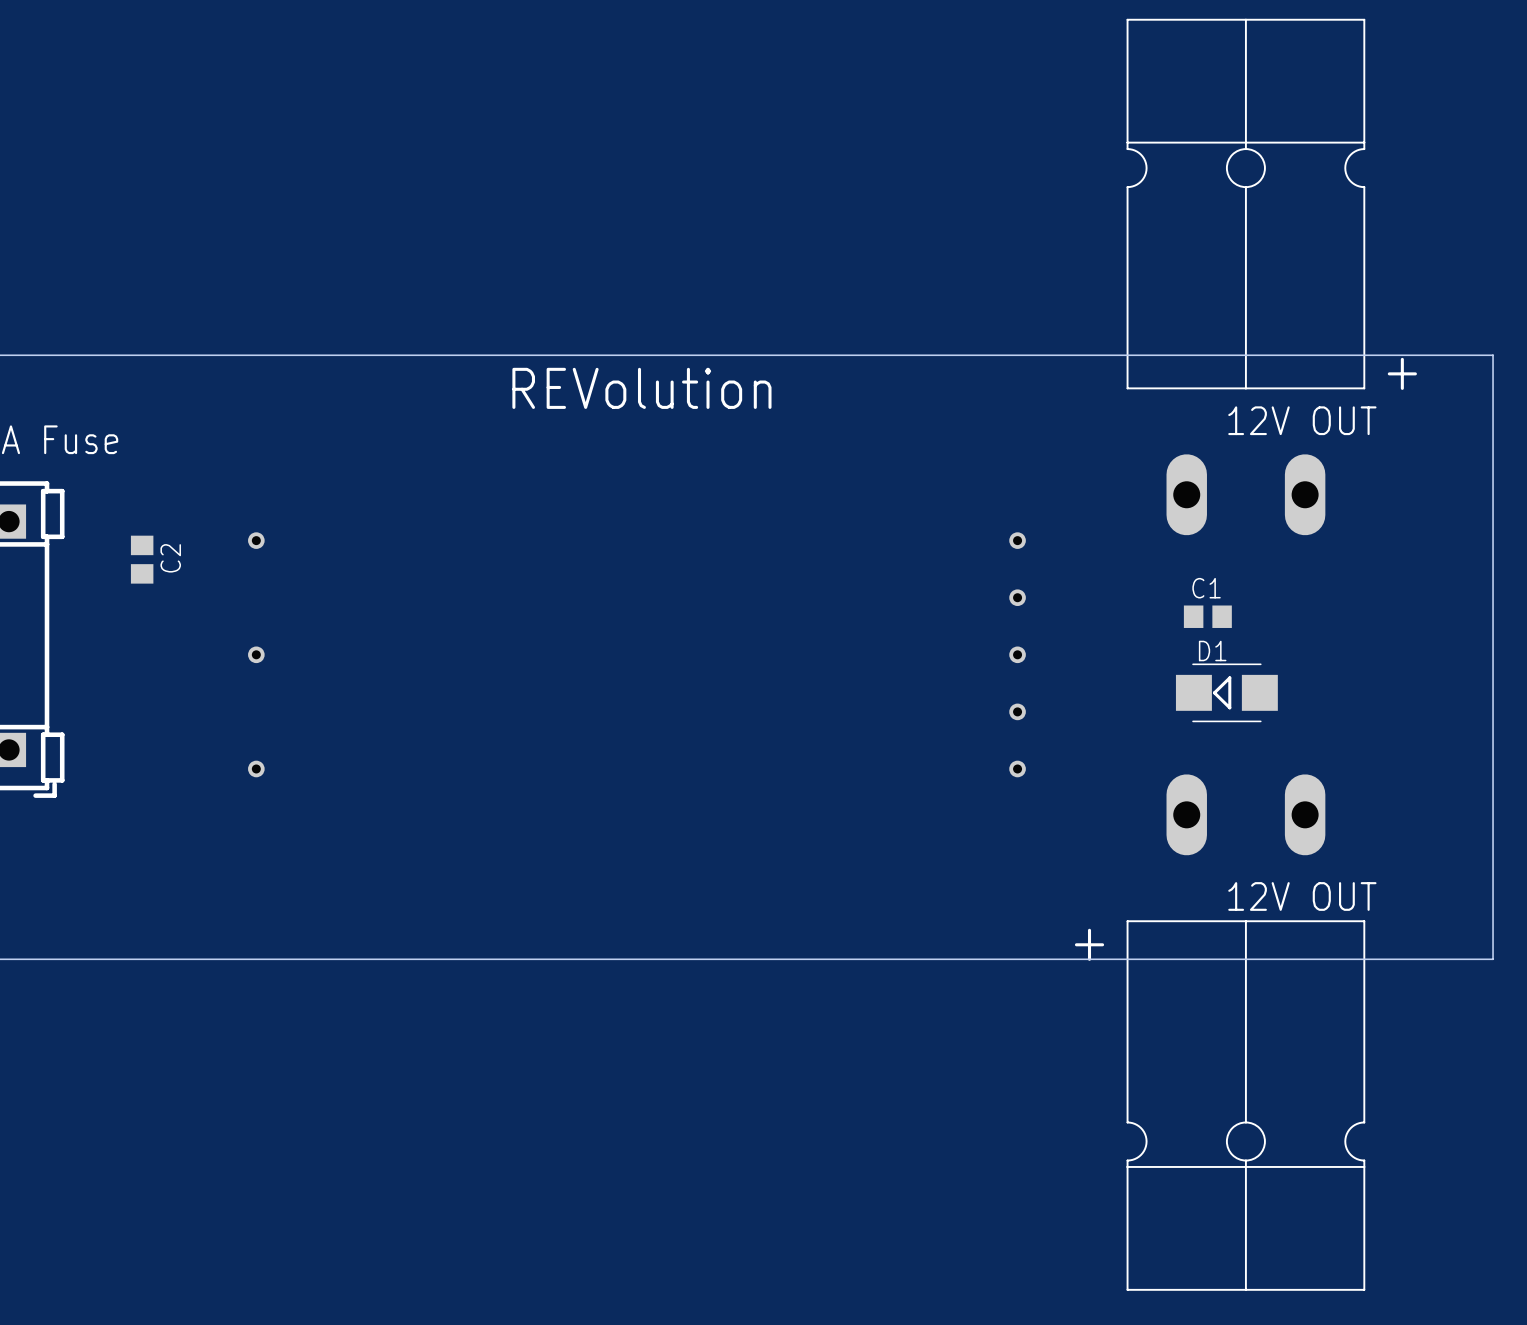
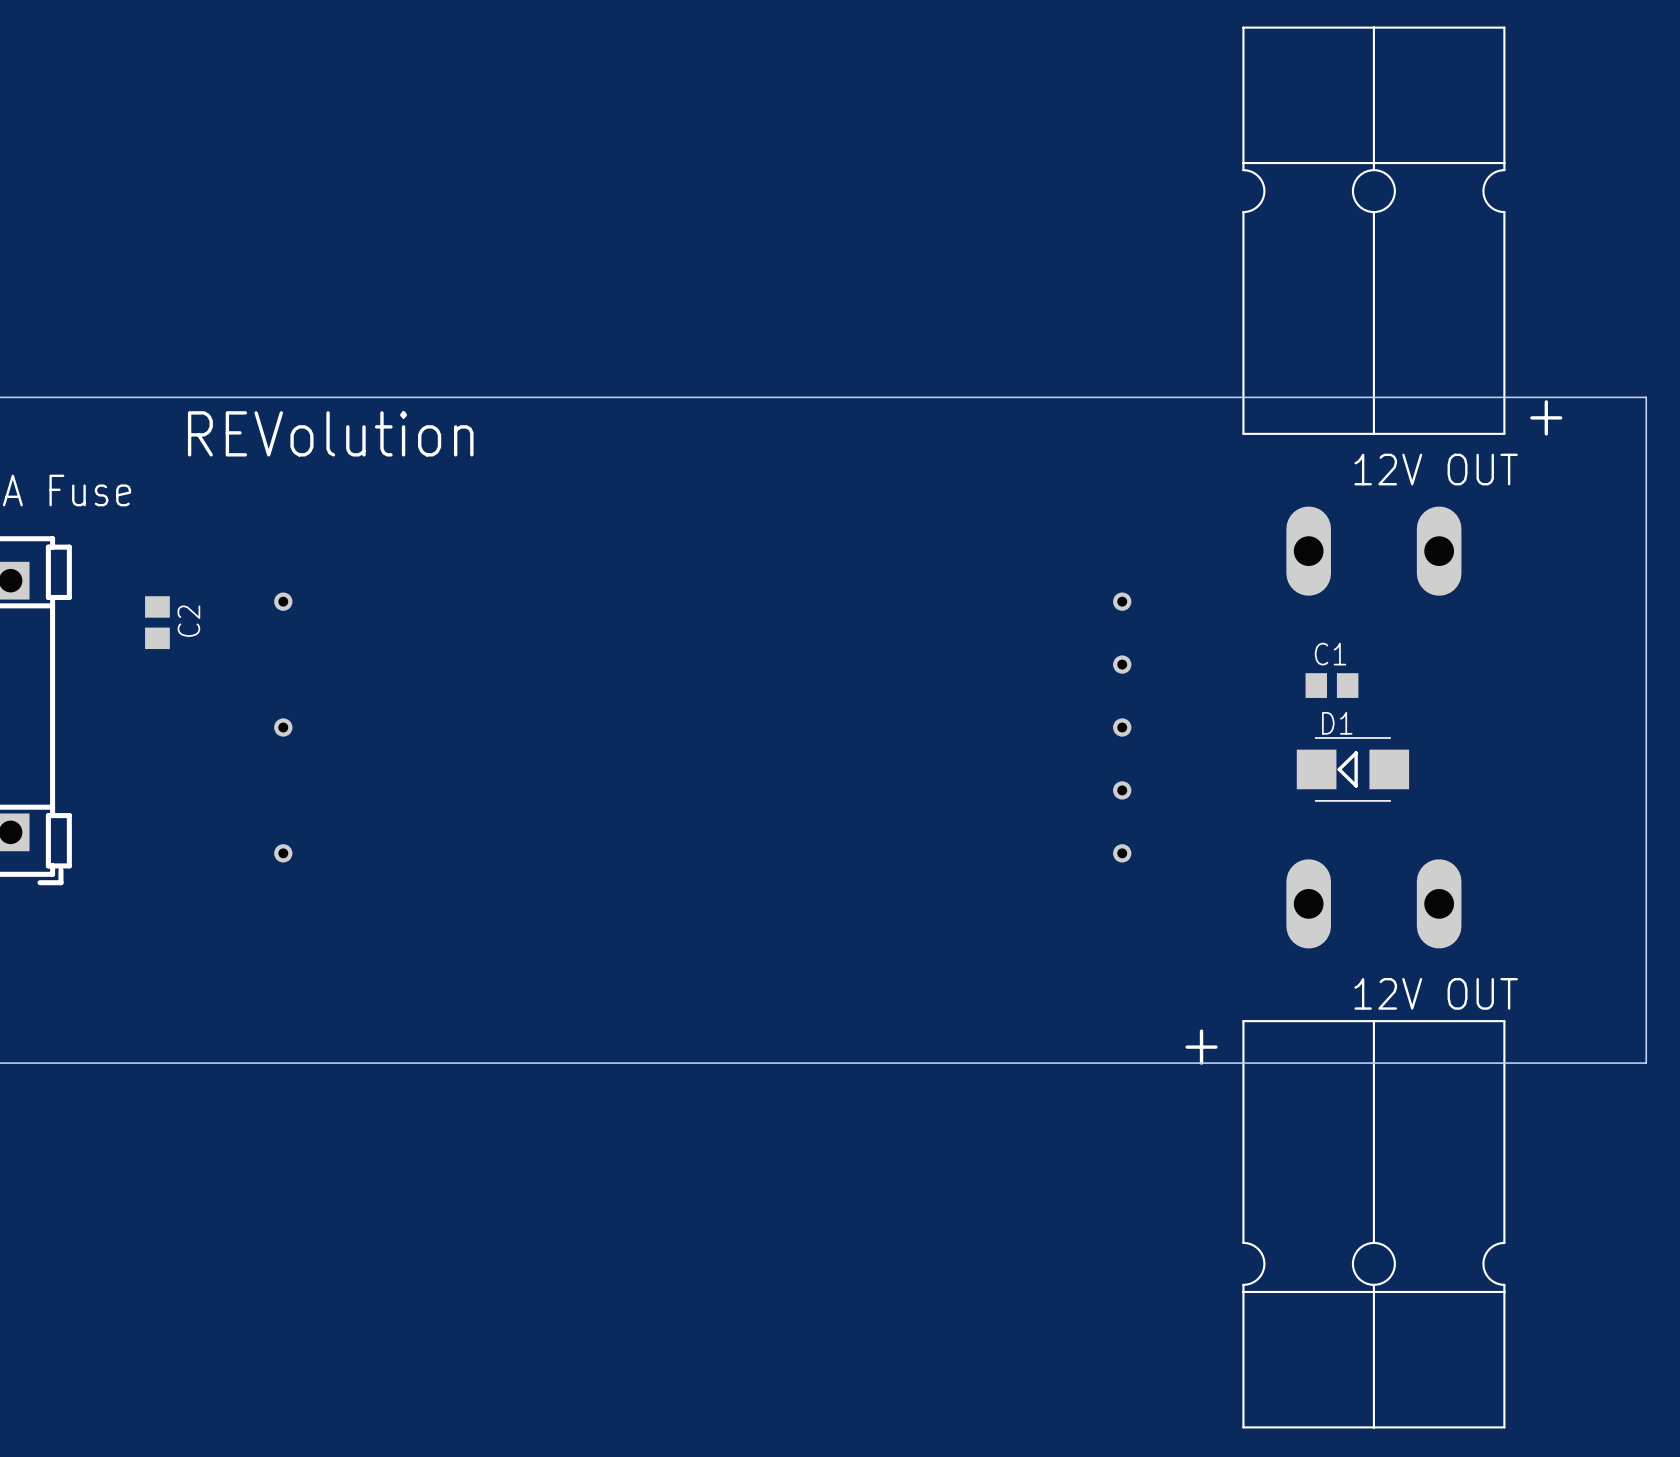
text position: REVolution (641, 388) -> REVolution (330, 433)

